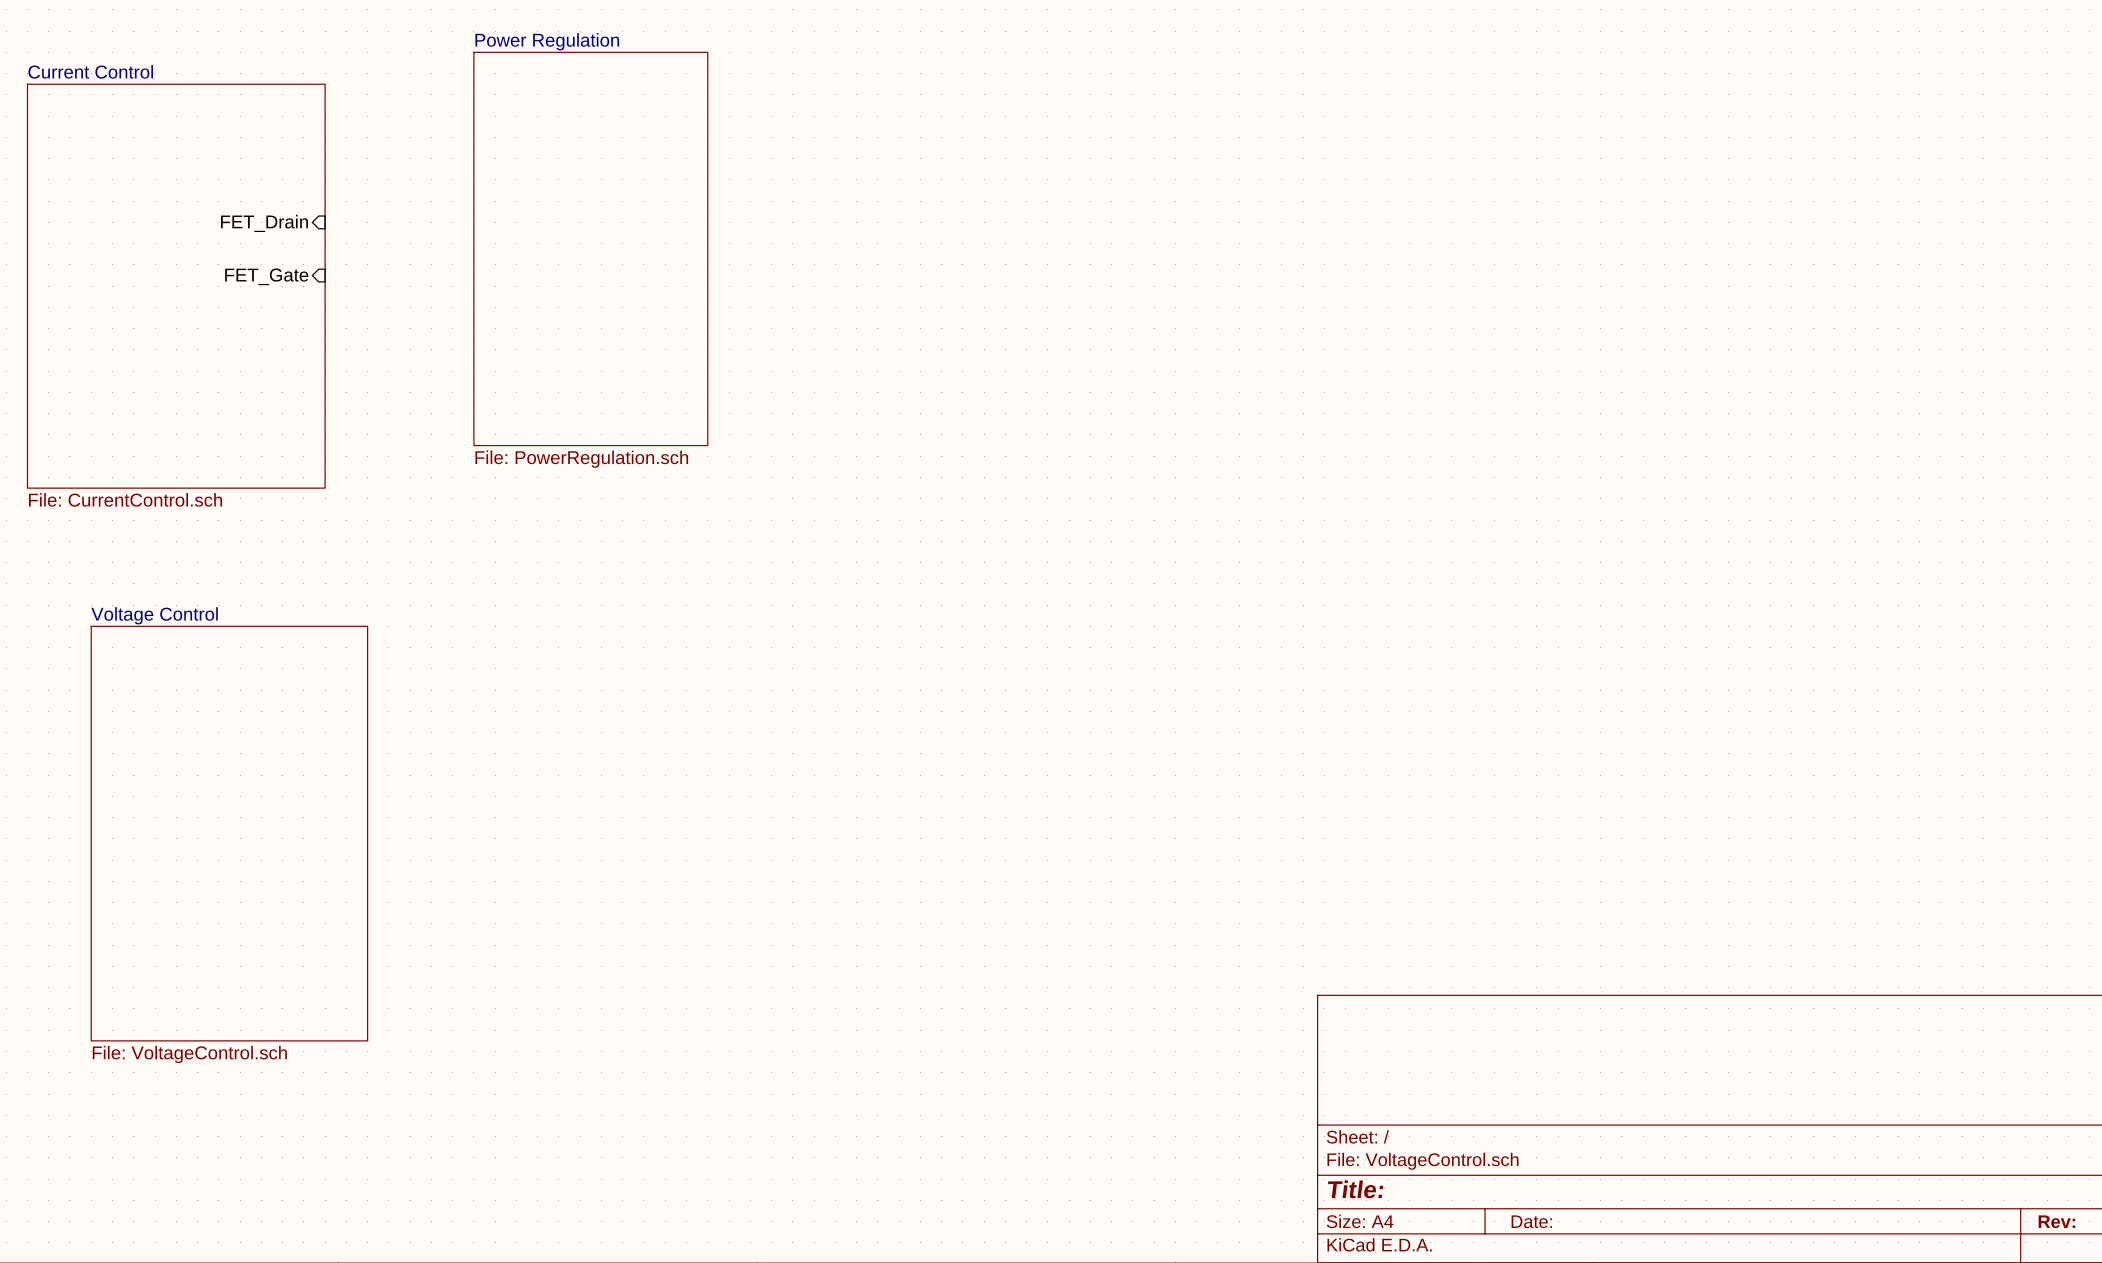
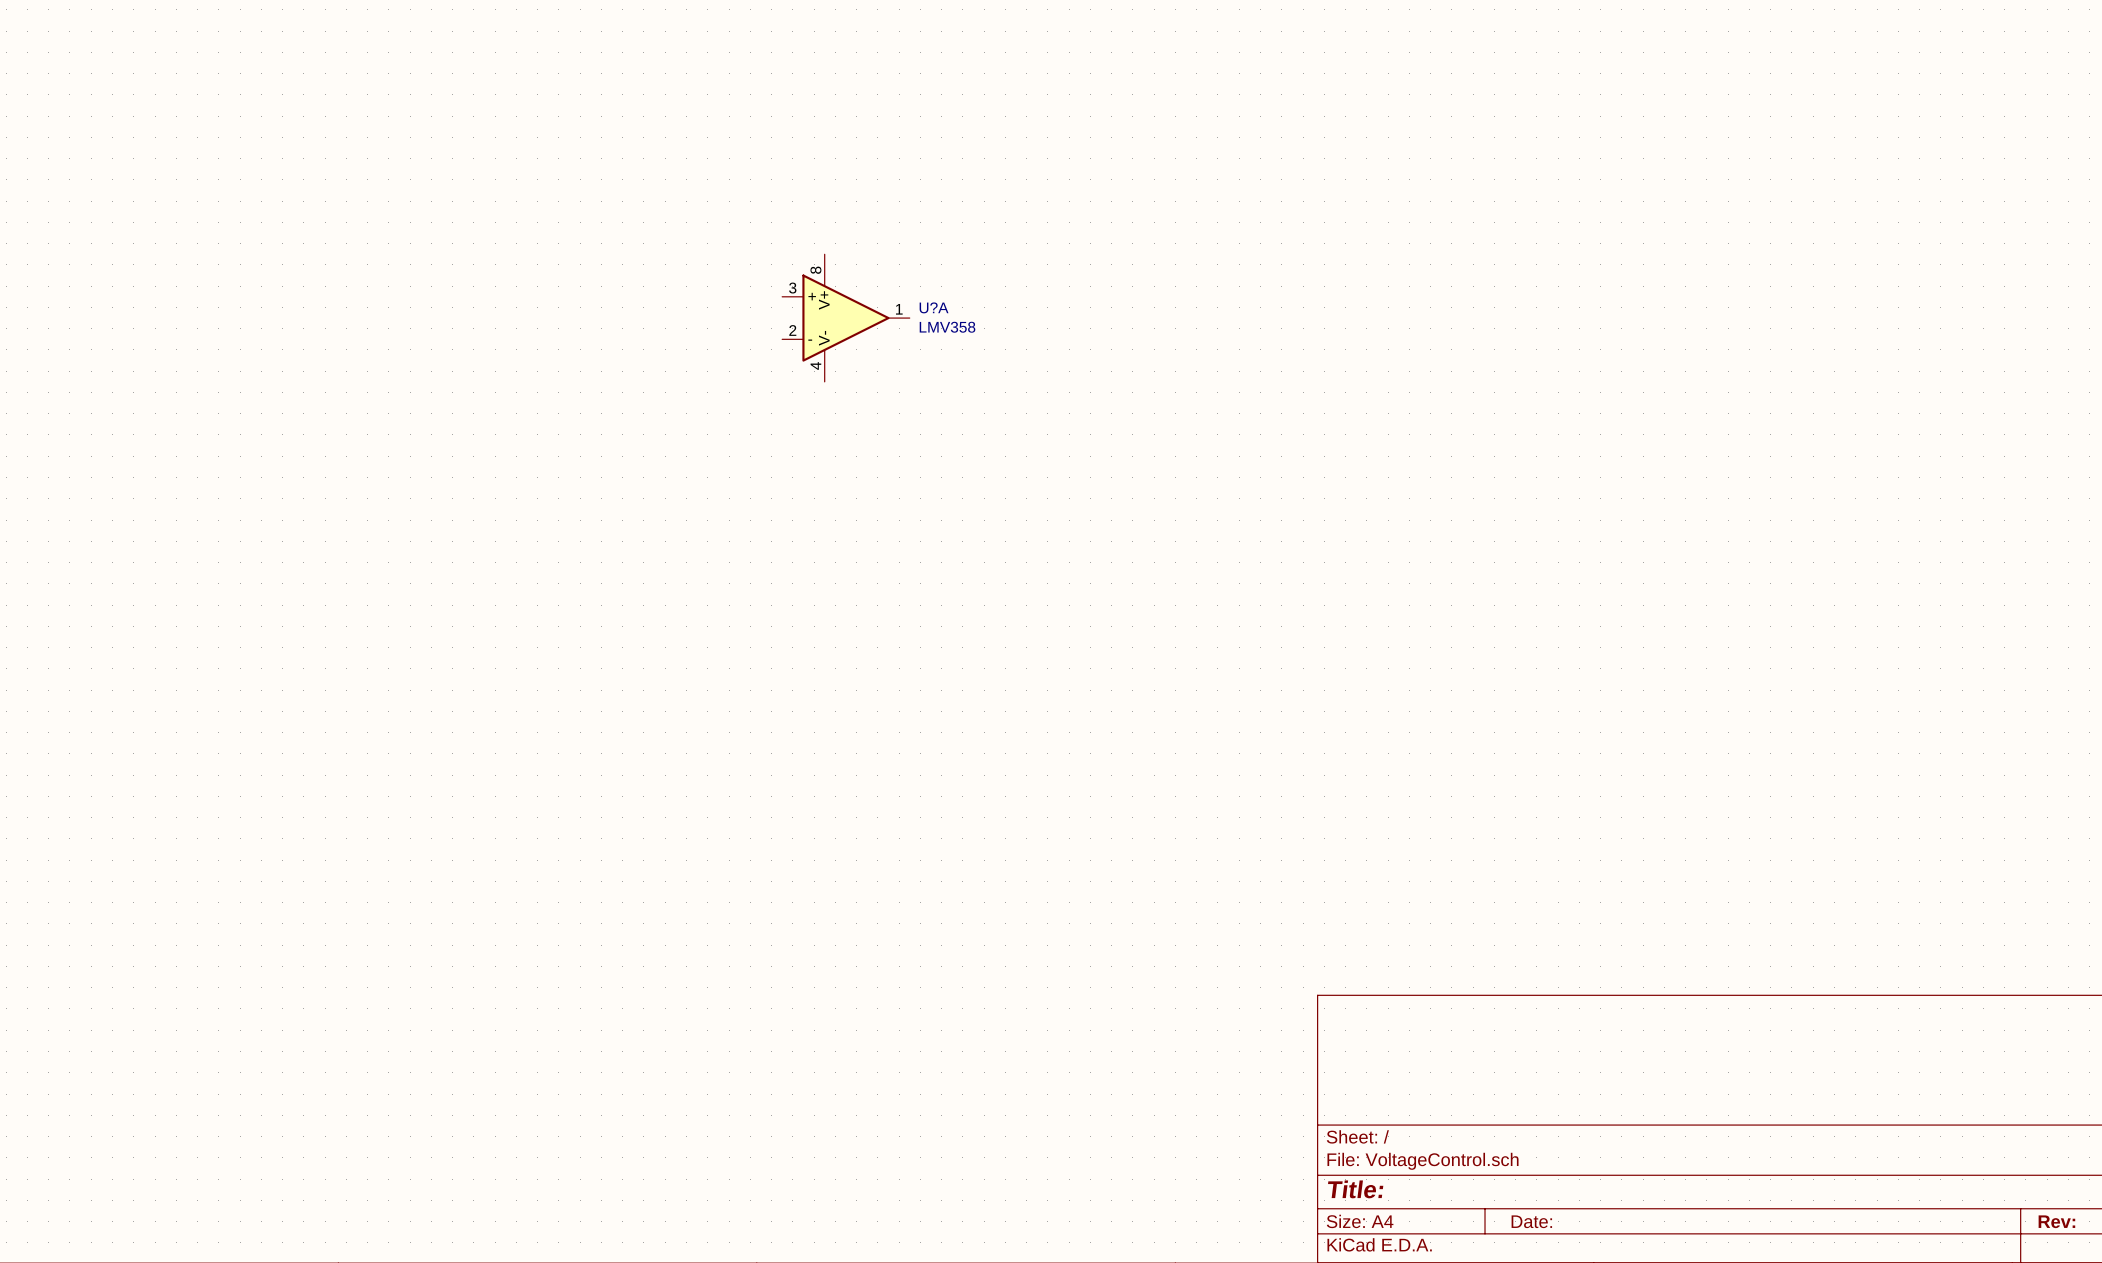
sheet pin: FET_Drain (264, 223) -> none
sheet Power Regulation: File: PowerRegulation.sch (590, 248) -> none
sheet pin: FET_Gate (266, 276) -> none
sheet Current Control: File: CurrentControl.sch (176, 286) -> none
U?A: none -> LMV358 (845, 318)
sheet Voltage Control: File: VoltageControl.sch (229, 833) -> none

